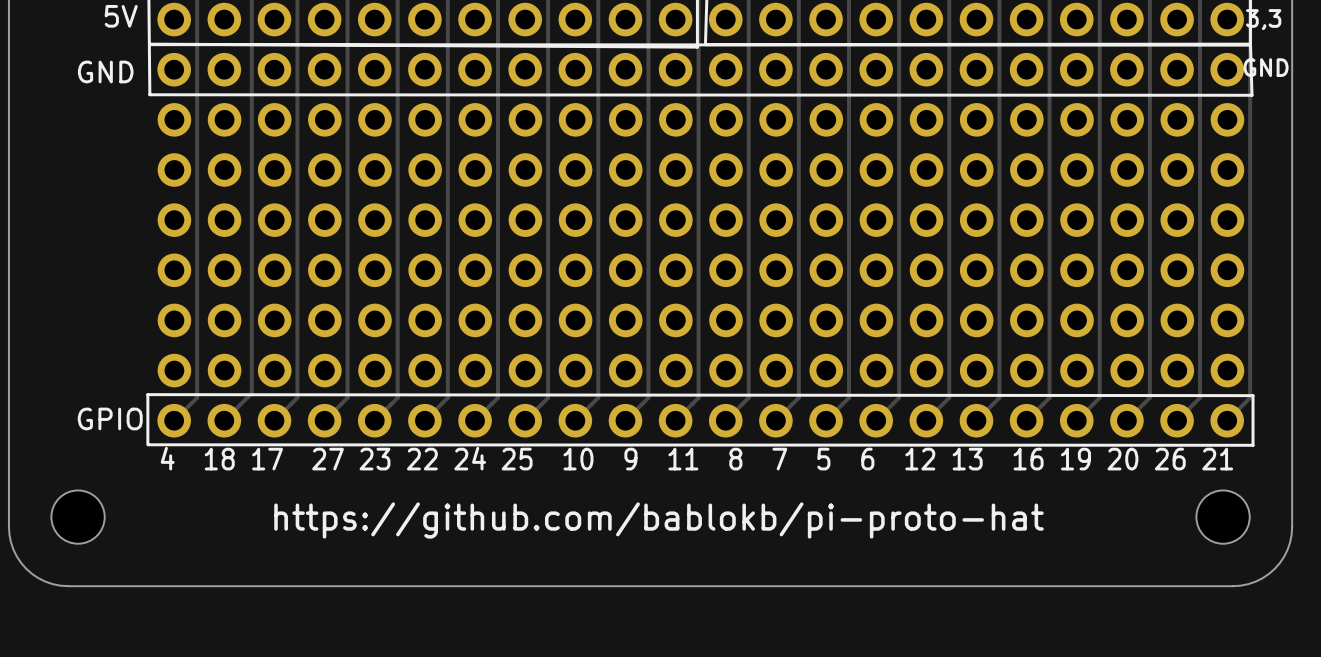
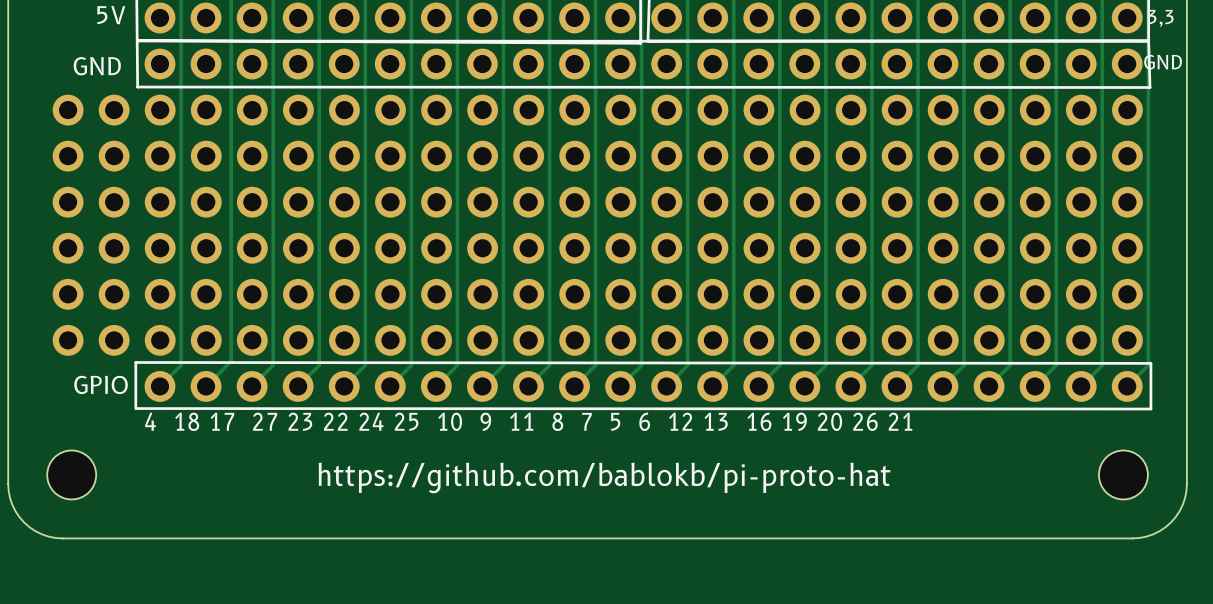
part: none -> (597, 225)

